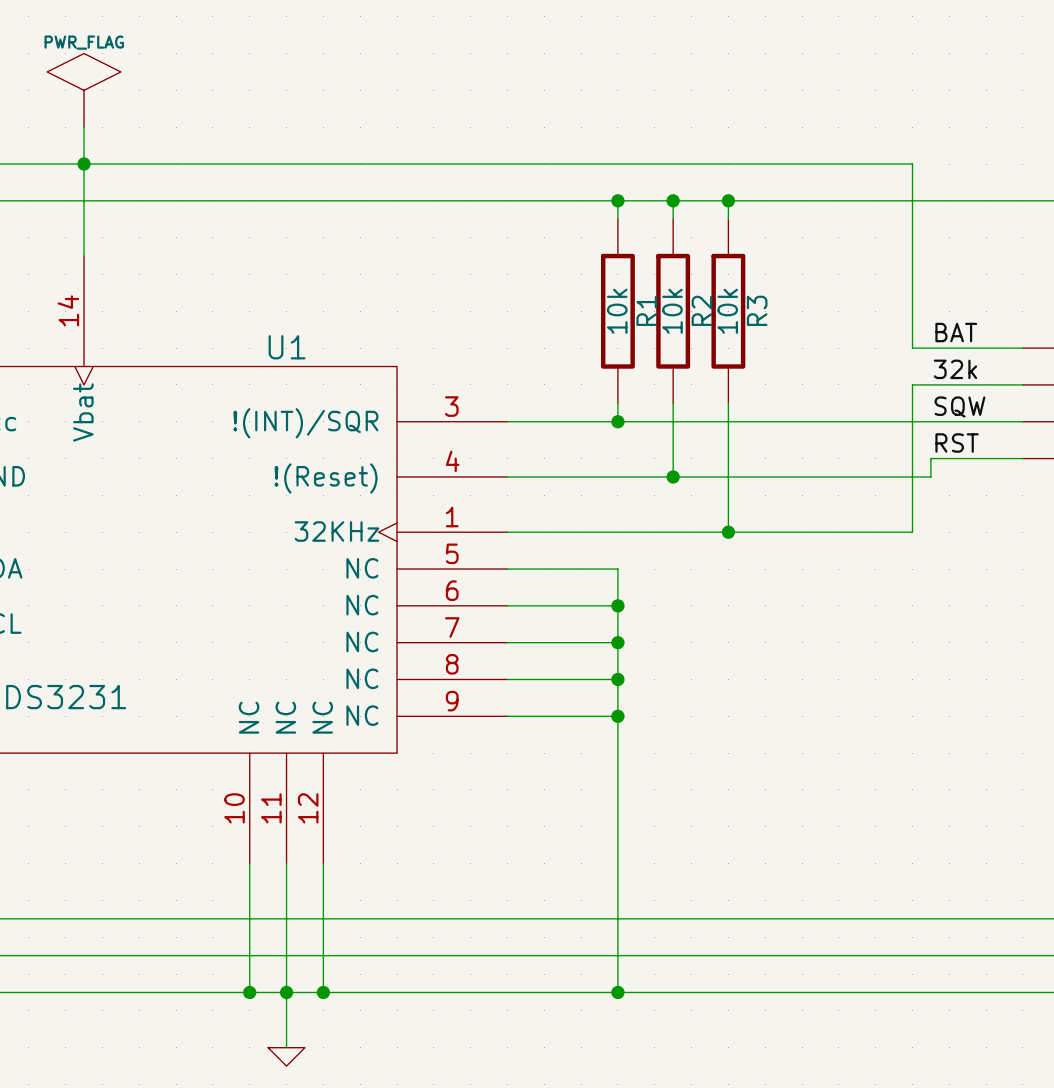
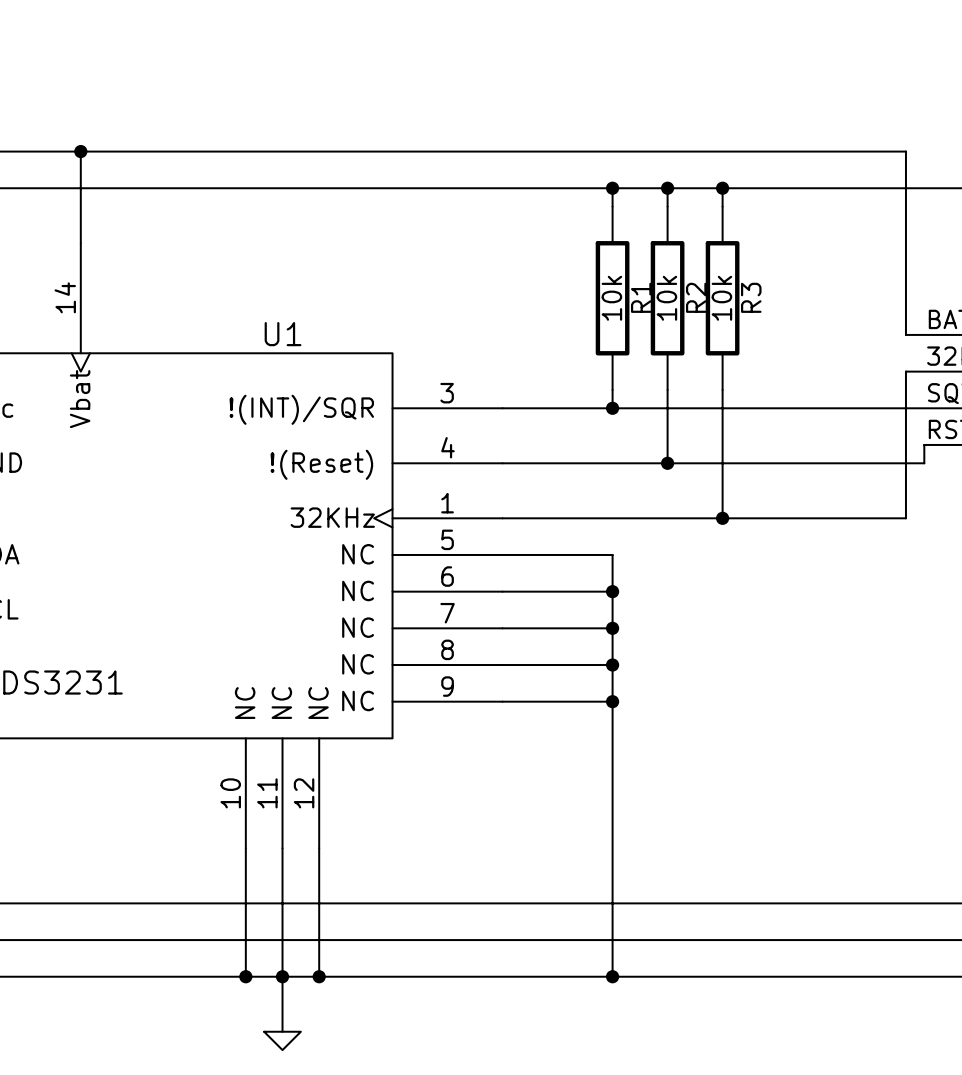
power symbol: PWR_FLAG (84, 90) -> none
wire: (84, 127) (84, 164) -> none

